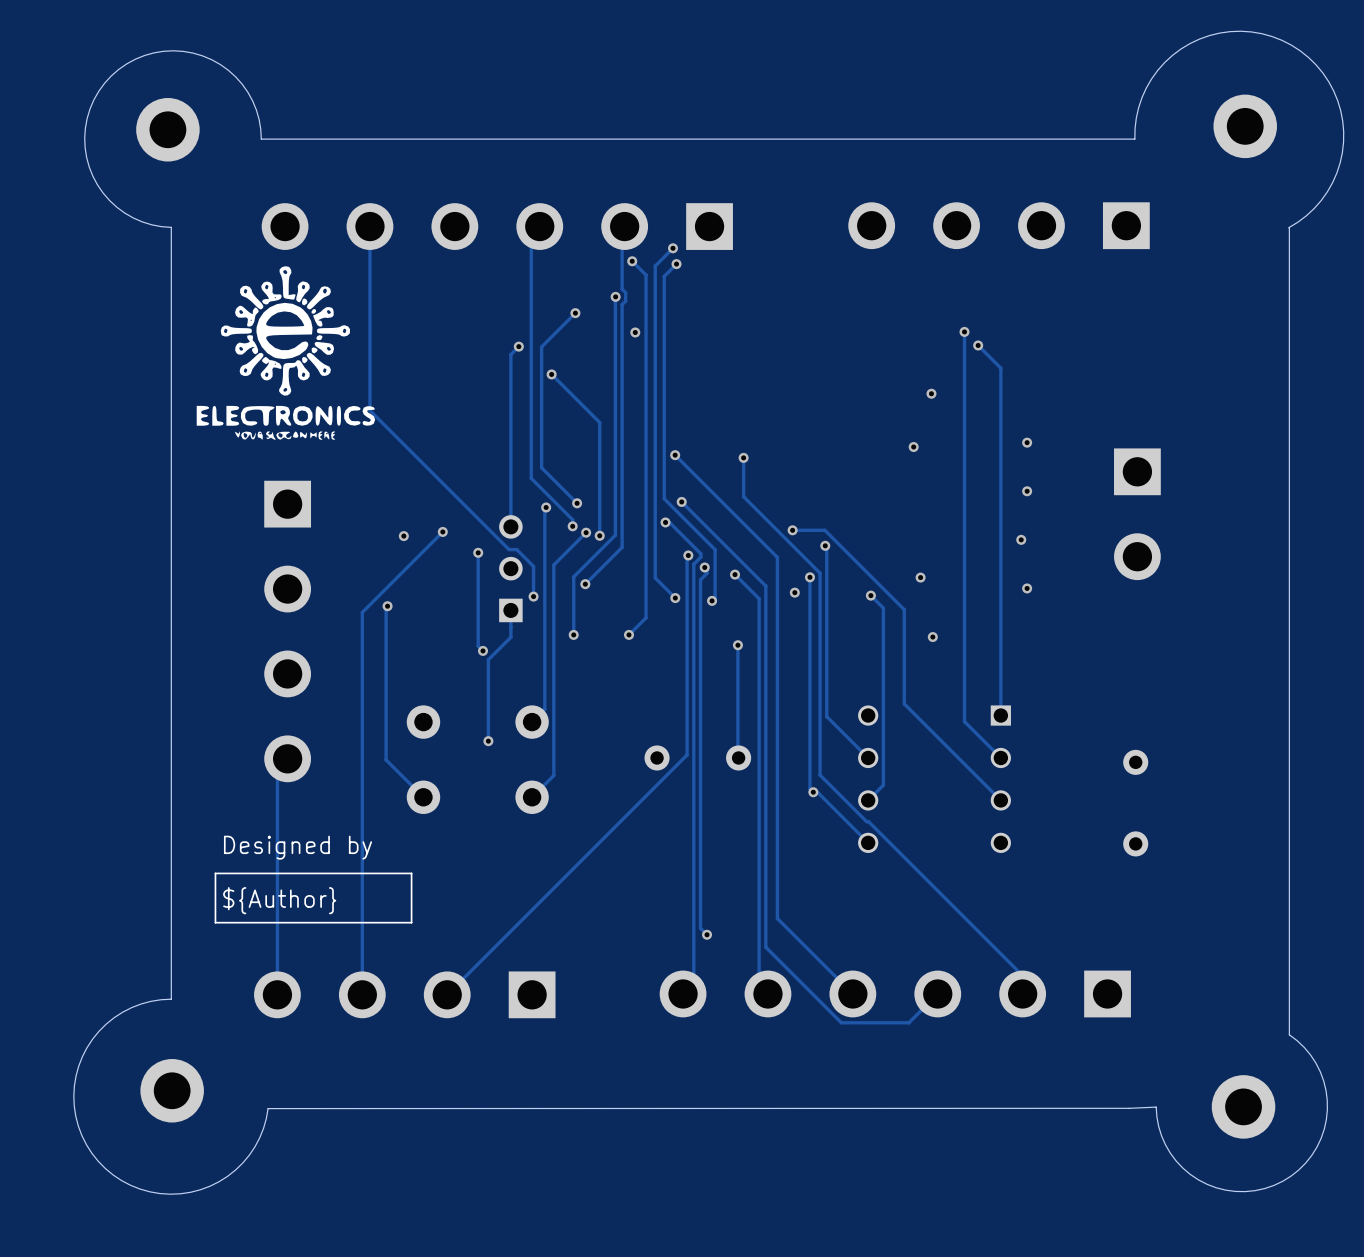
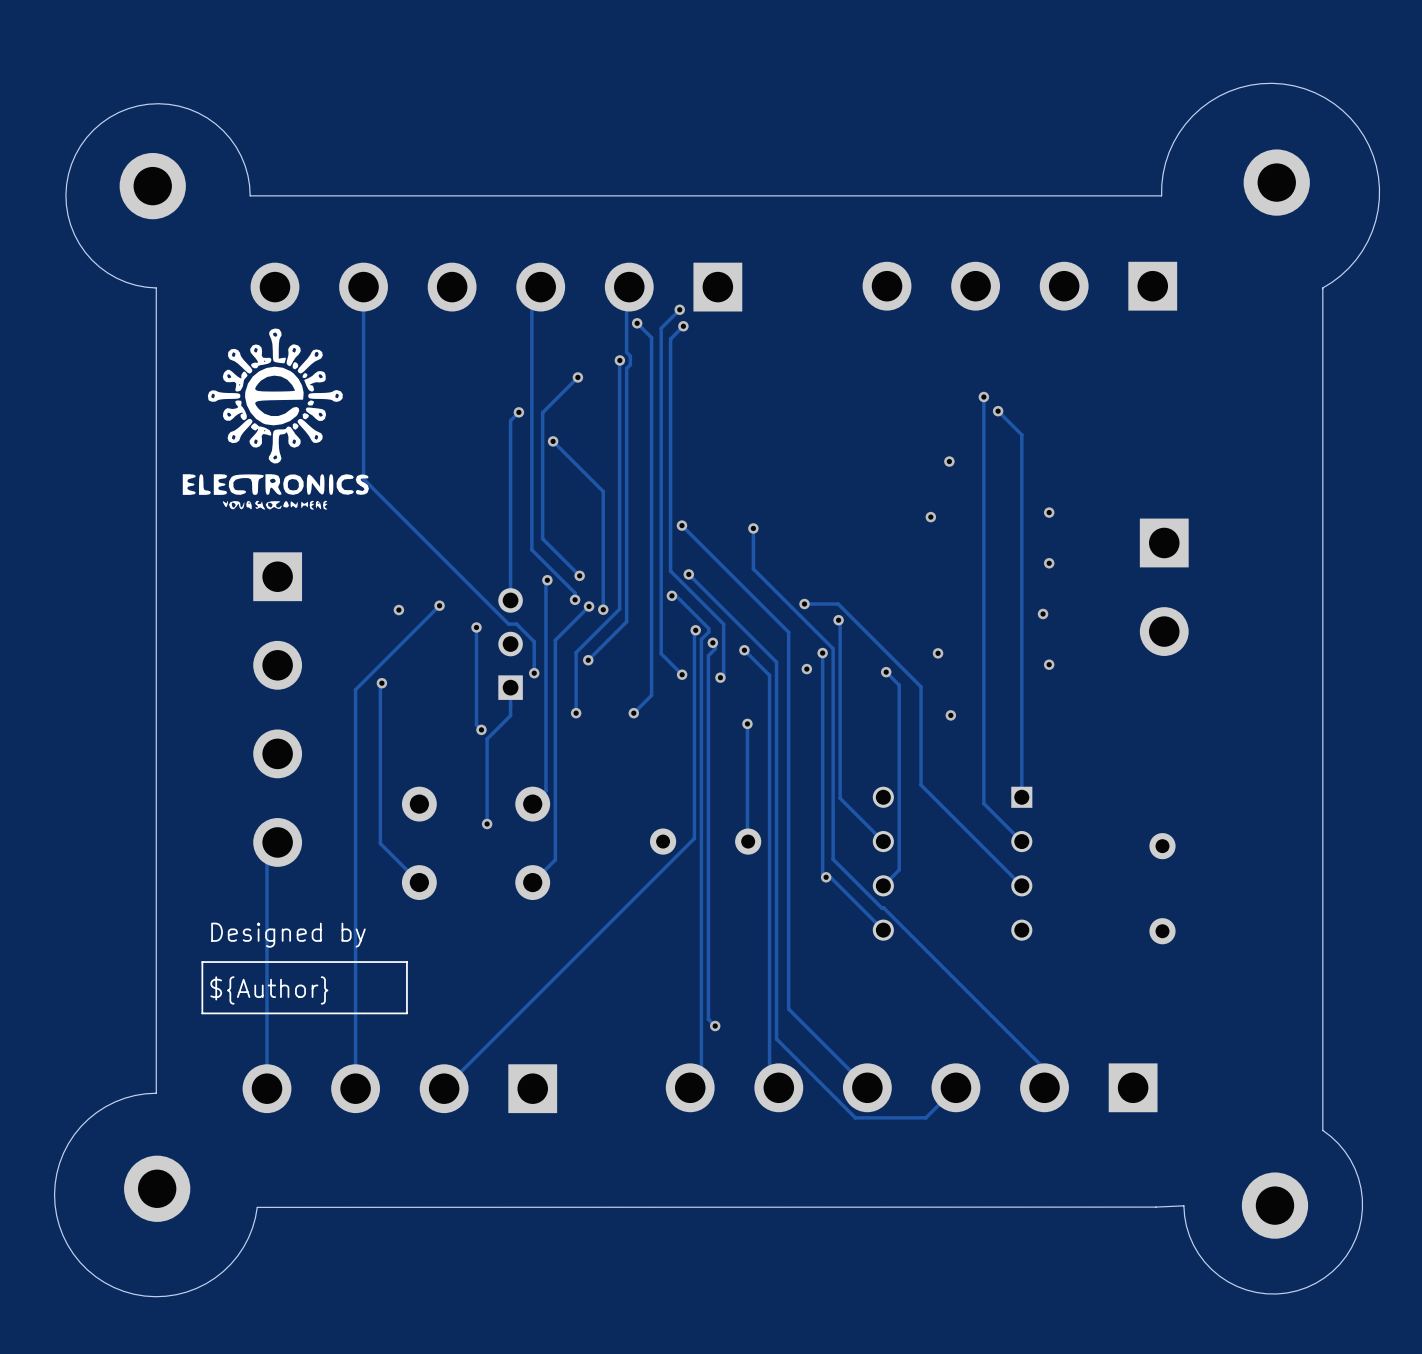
via: (635, 332) -> none

